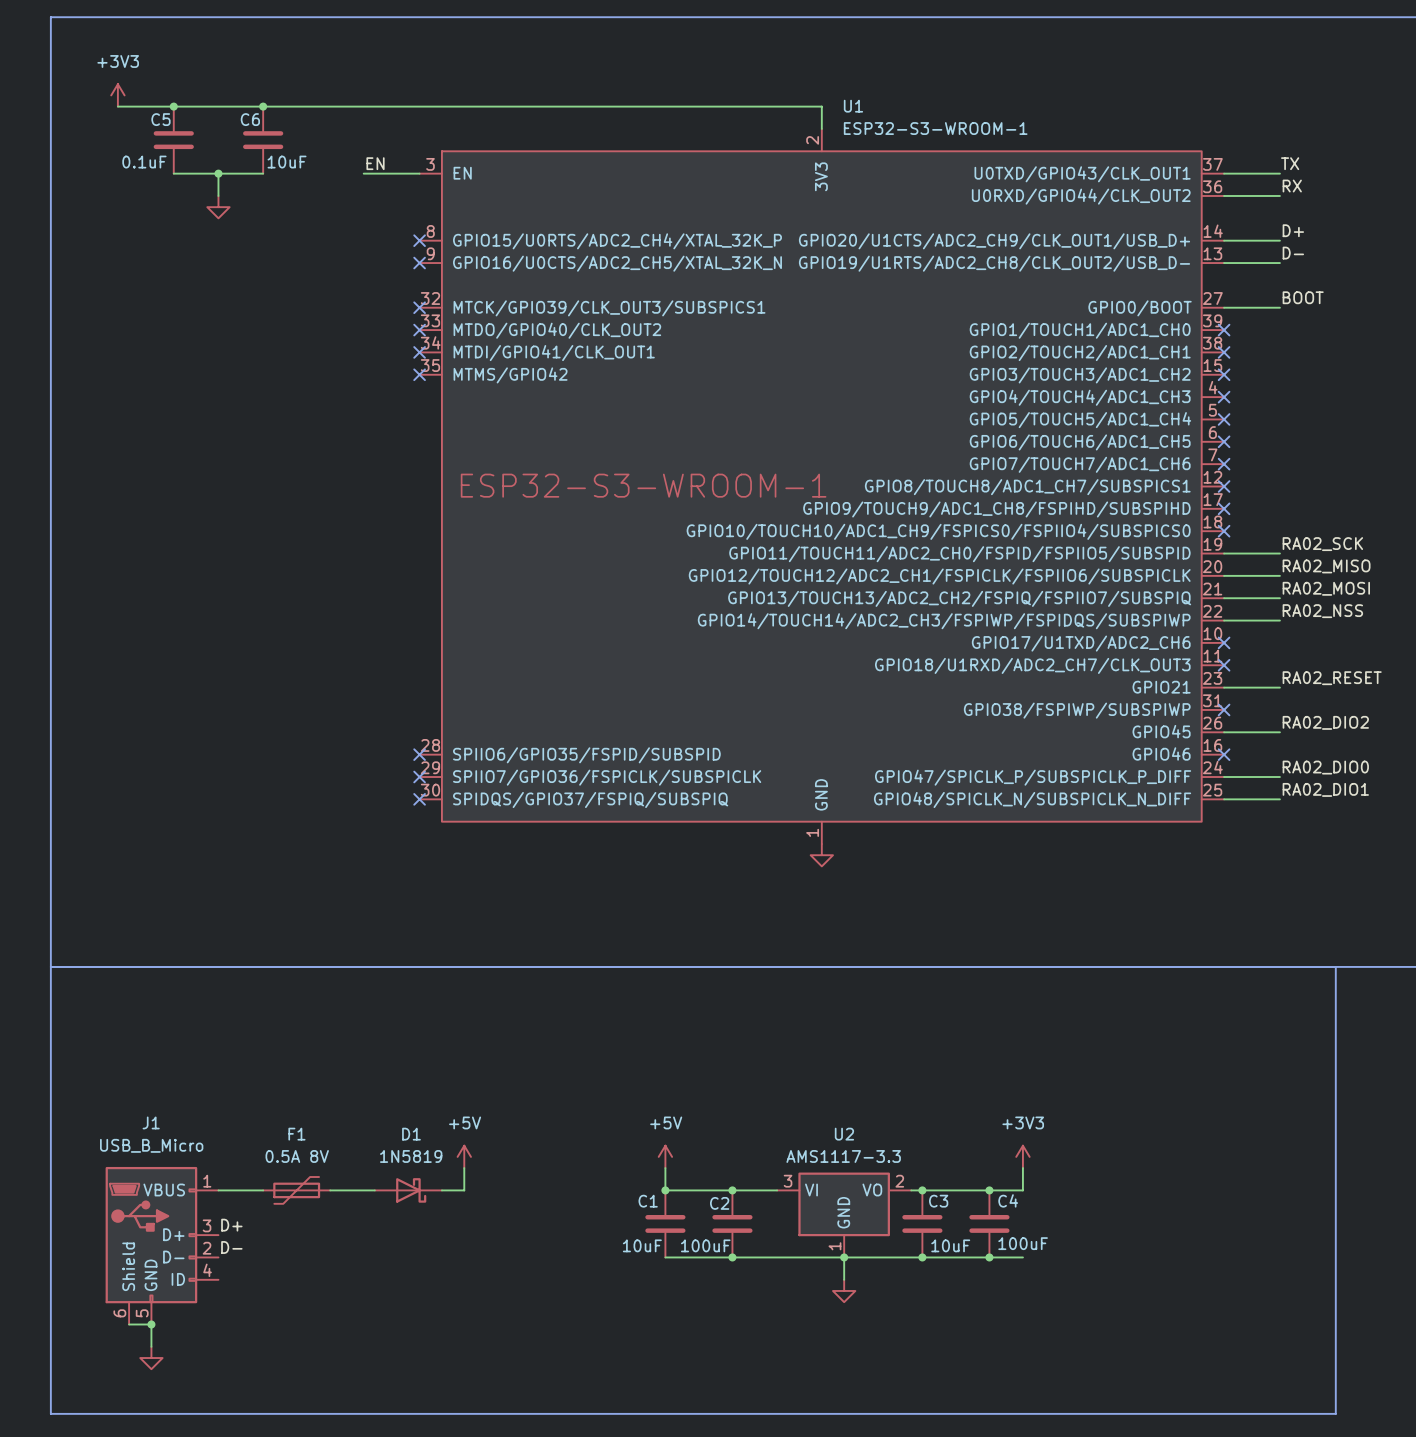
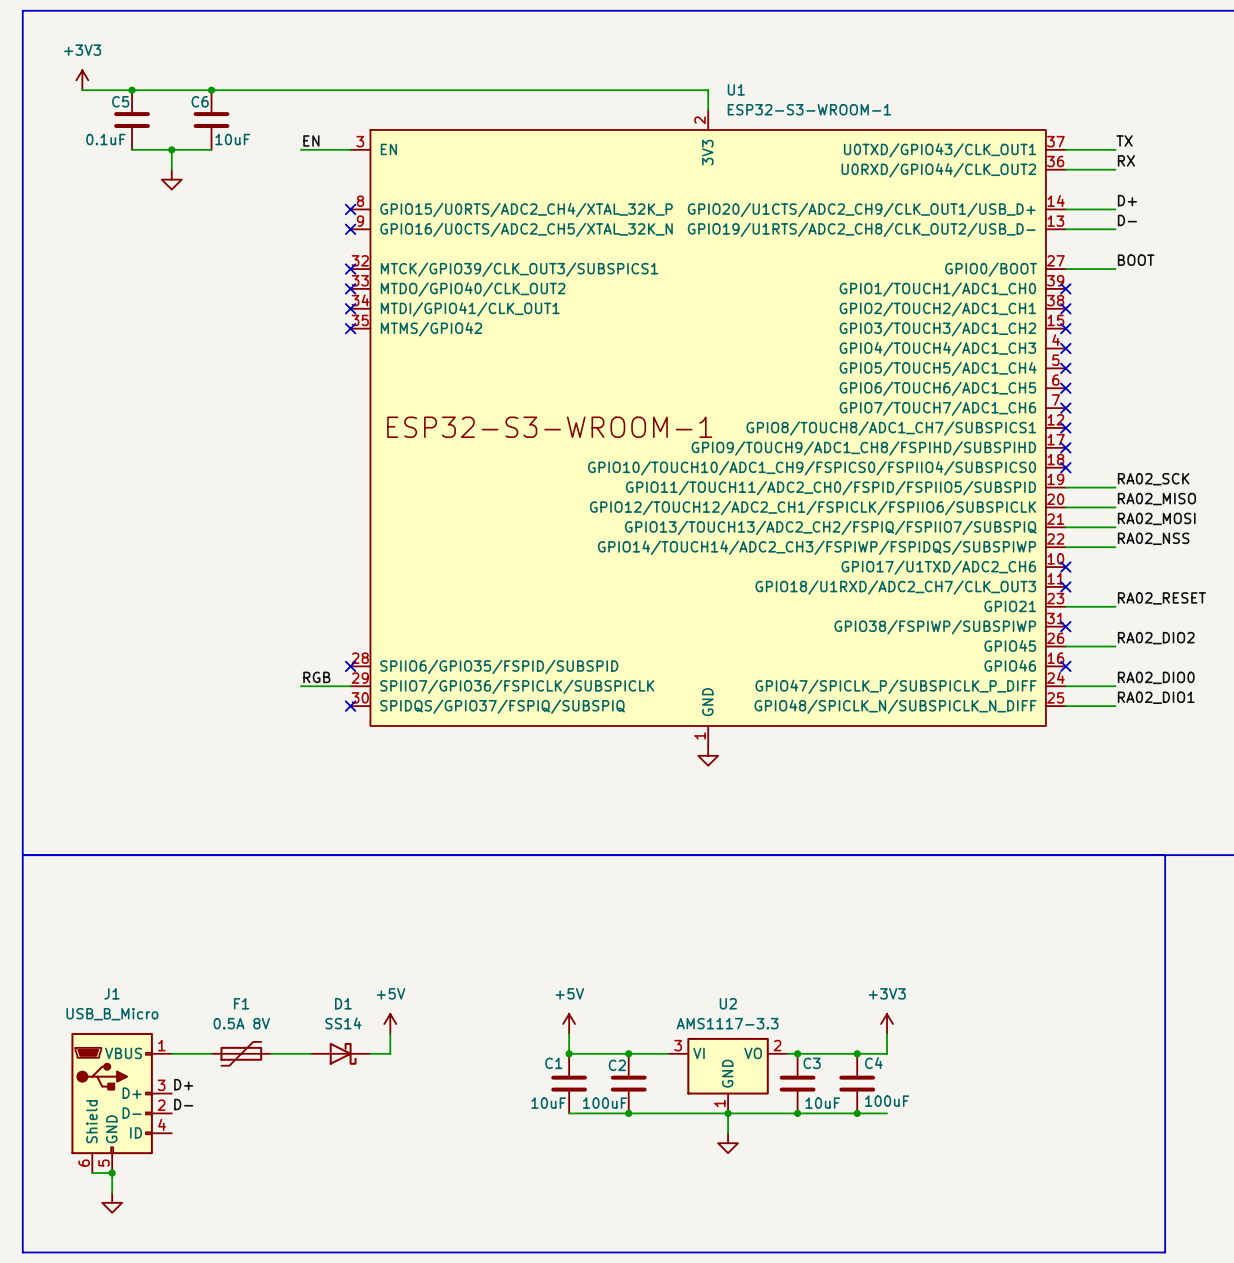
label: none -> RGB (316, 677)
wire: none -> (300, 686) (350, 686)
no-connect mark: (419, 777) -> none
D1 value: 1N5819 (411, 1156) -> SS14 (343, 1023)

